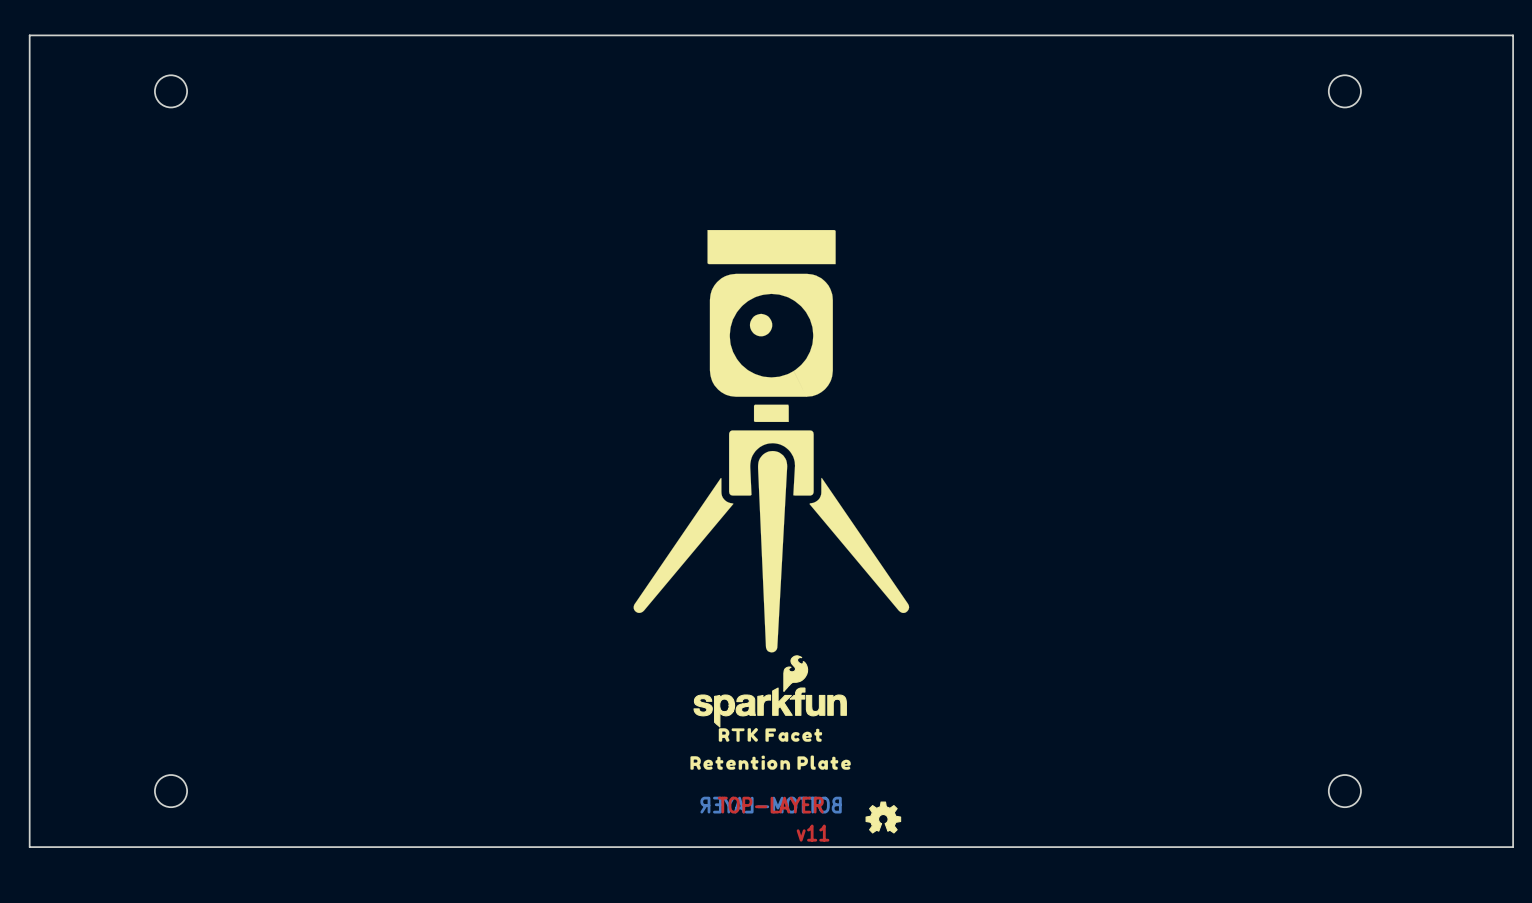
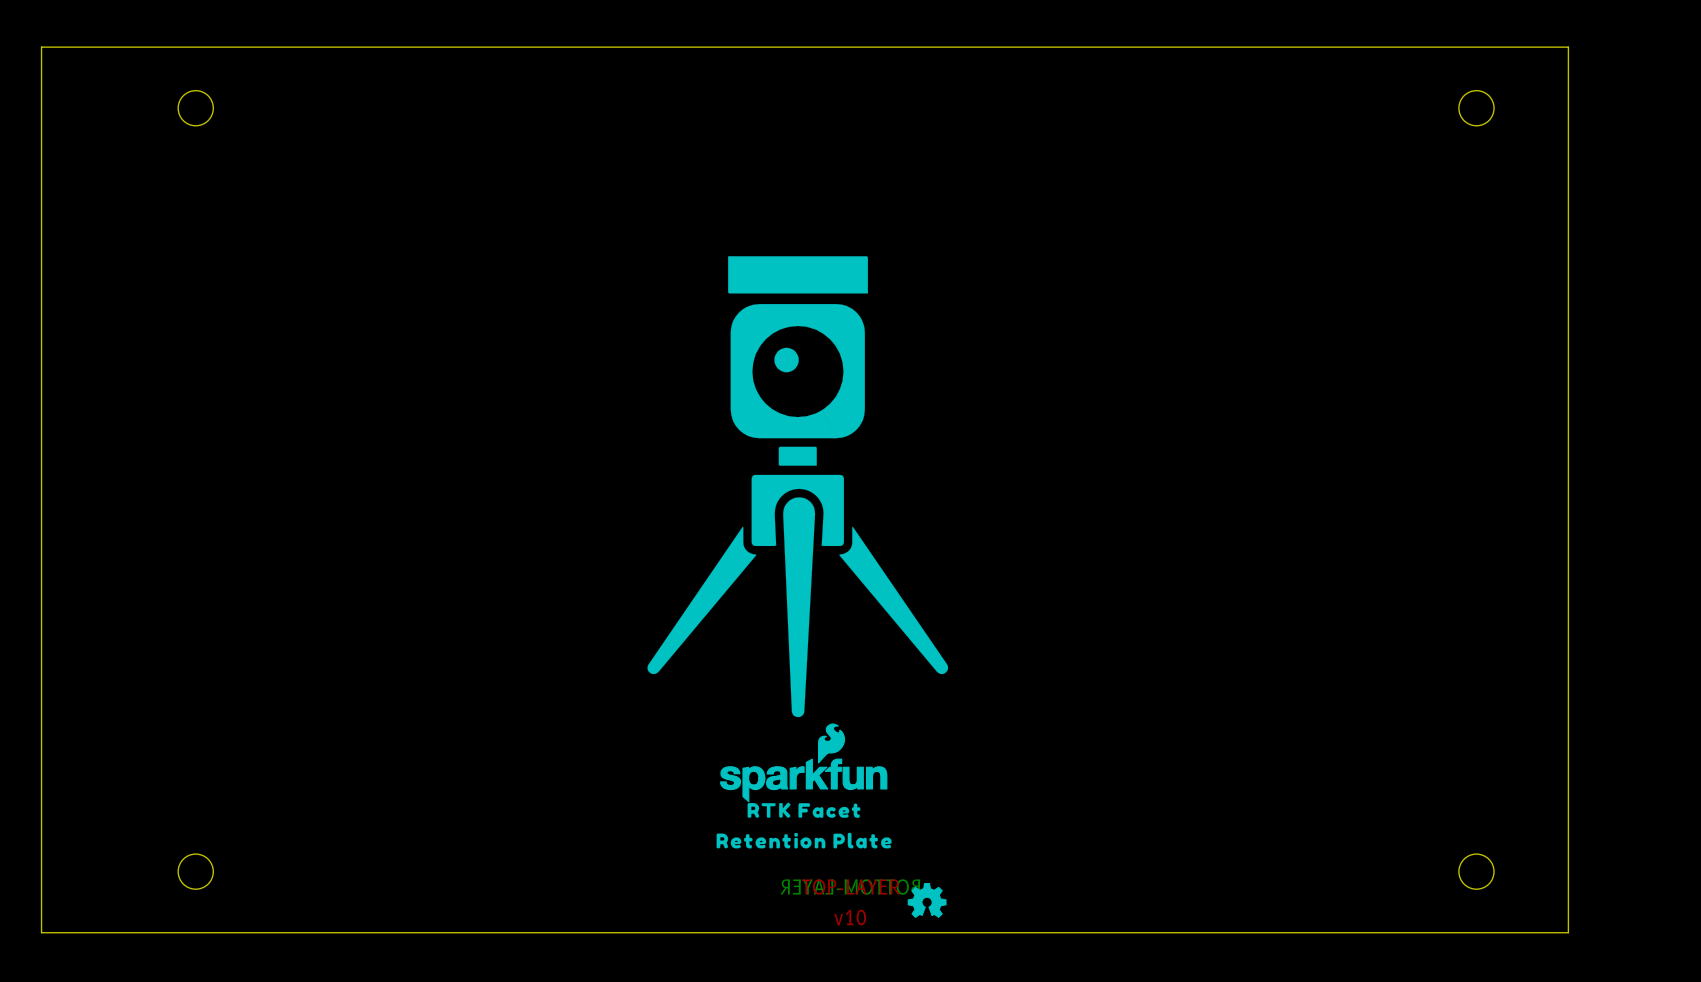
board edge: (1429, 35) (1513, 35) (1513, 847) (1429, 847) -> (1568, 47) (1568, 932)
drawing position: (771, 441) -> (797, 486)
drawing position: (770, 691) -> (803, 762)
drawing position: (770, 734) -> (803, 810)
drawing position: (770, 762) -> (804, 840)
drawing position: (883, 817) -> (927, 900)
text: v11 (813, 833) -> v10 (850, 917)

